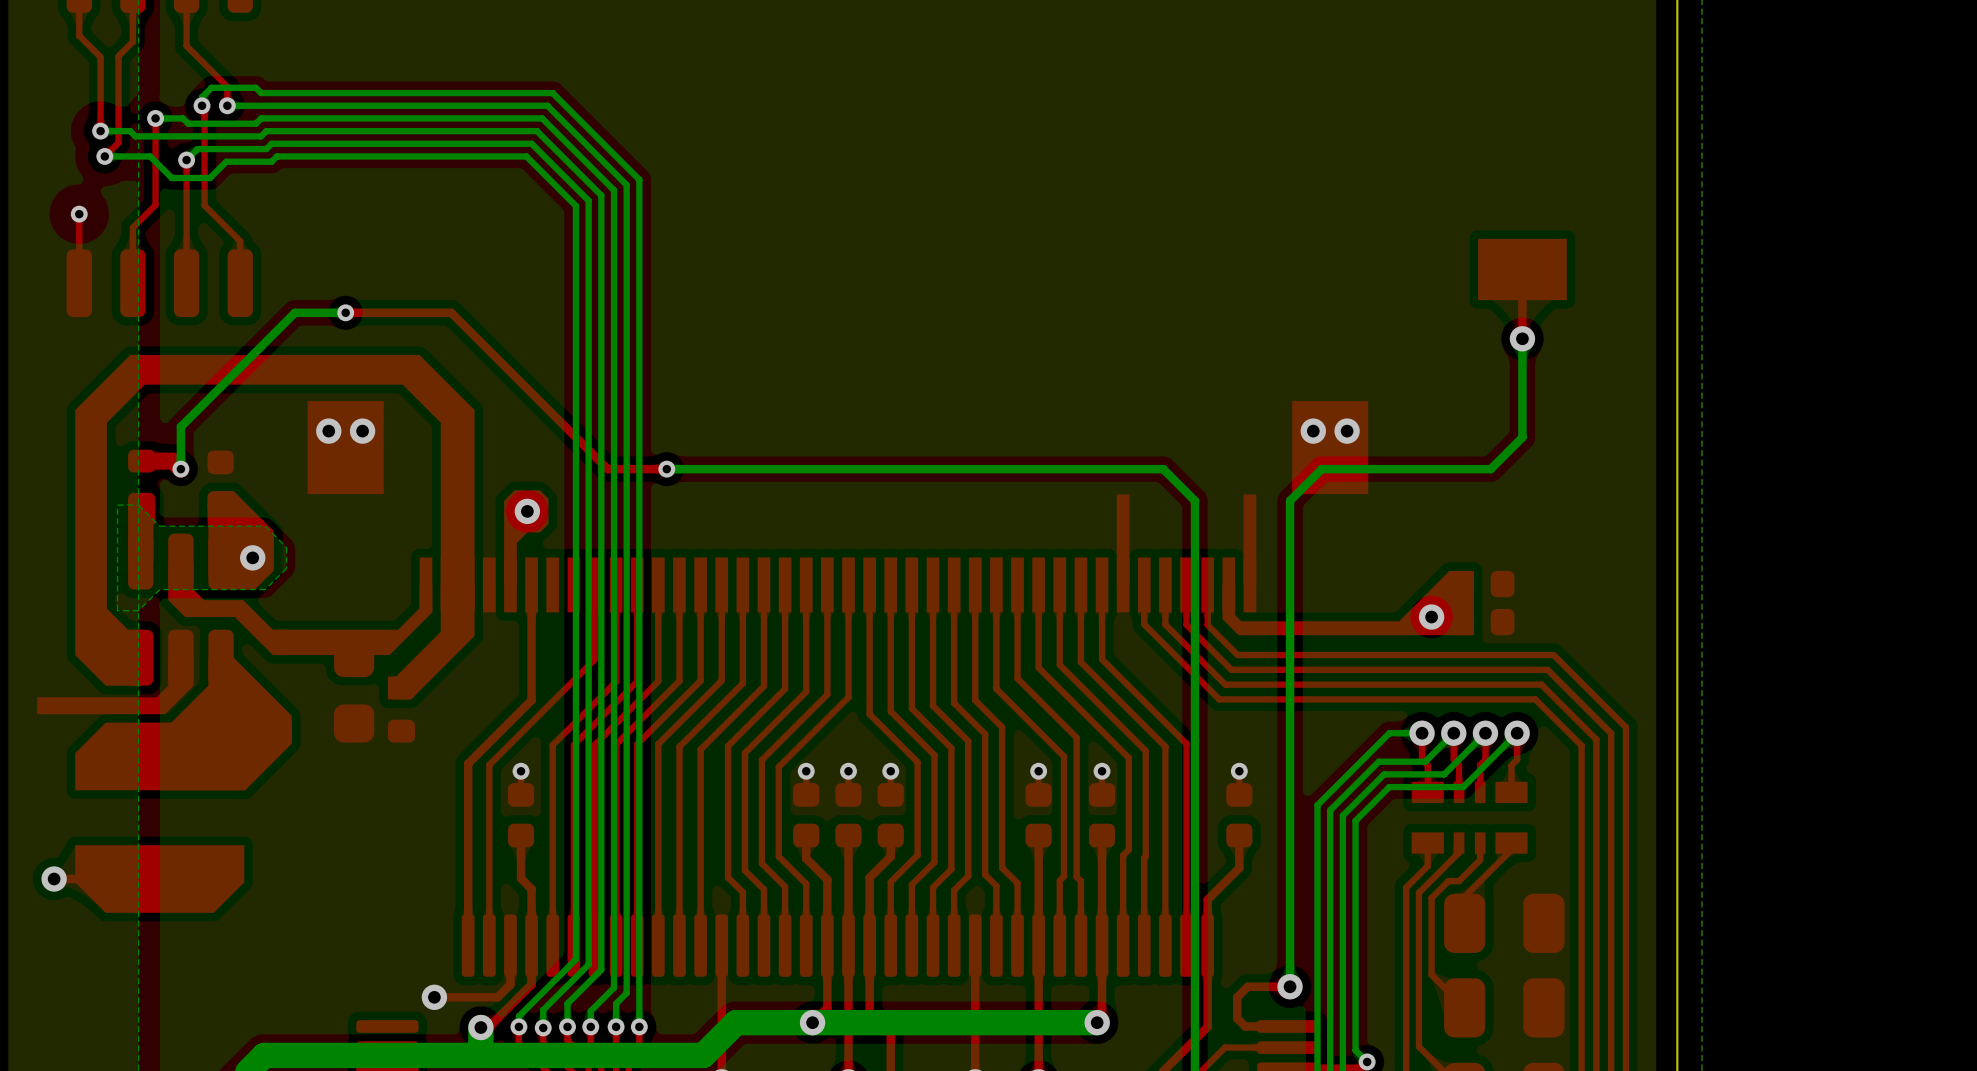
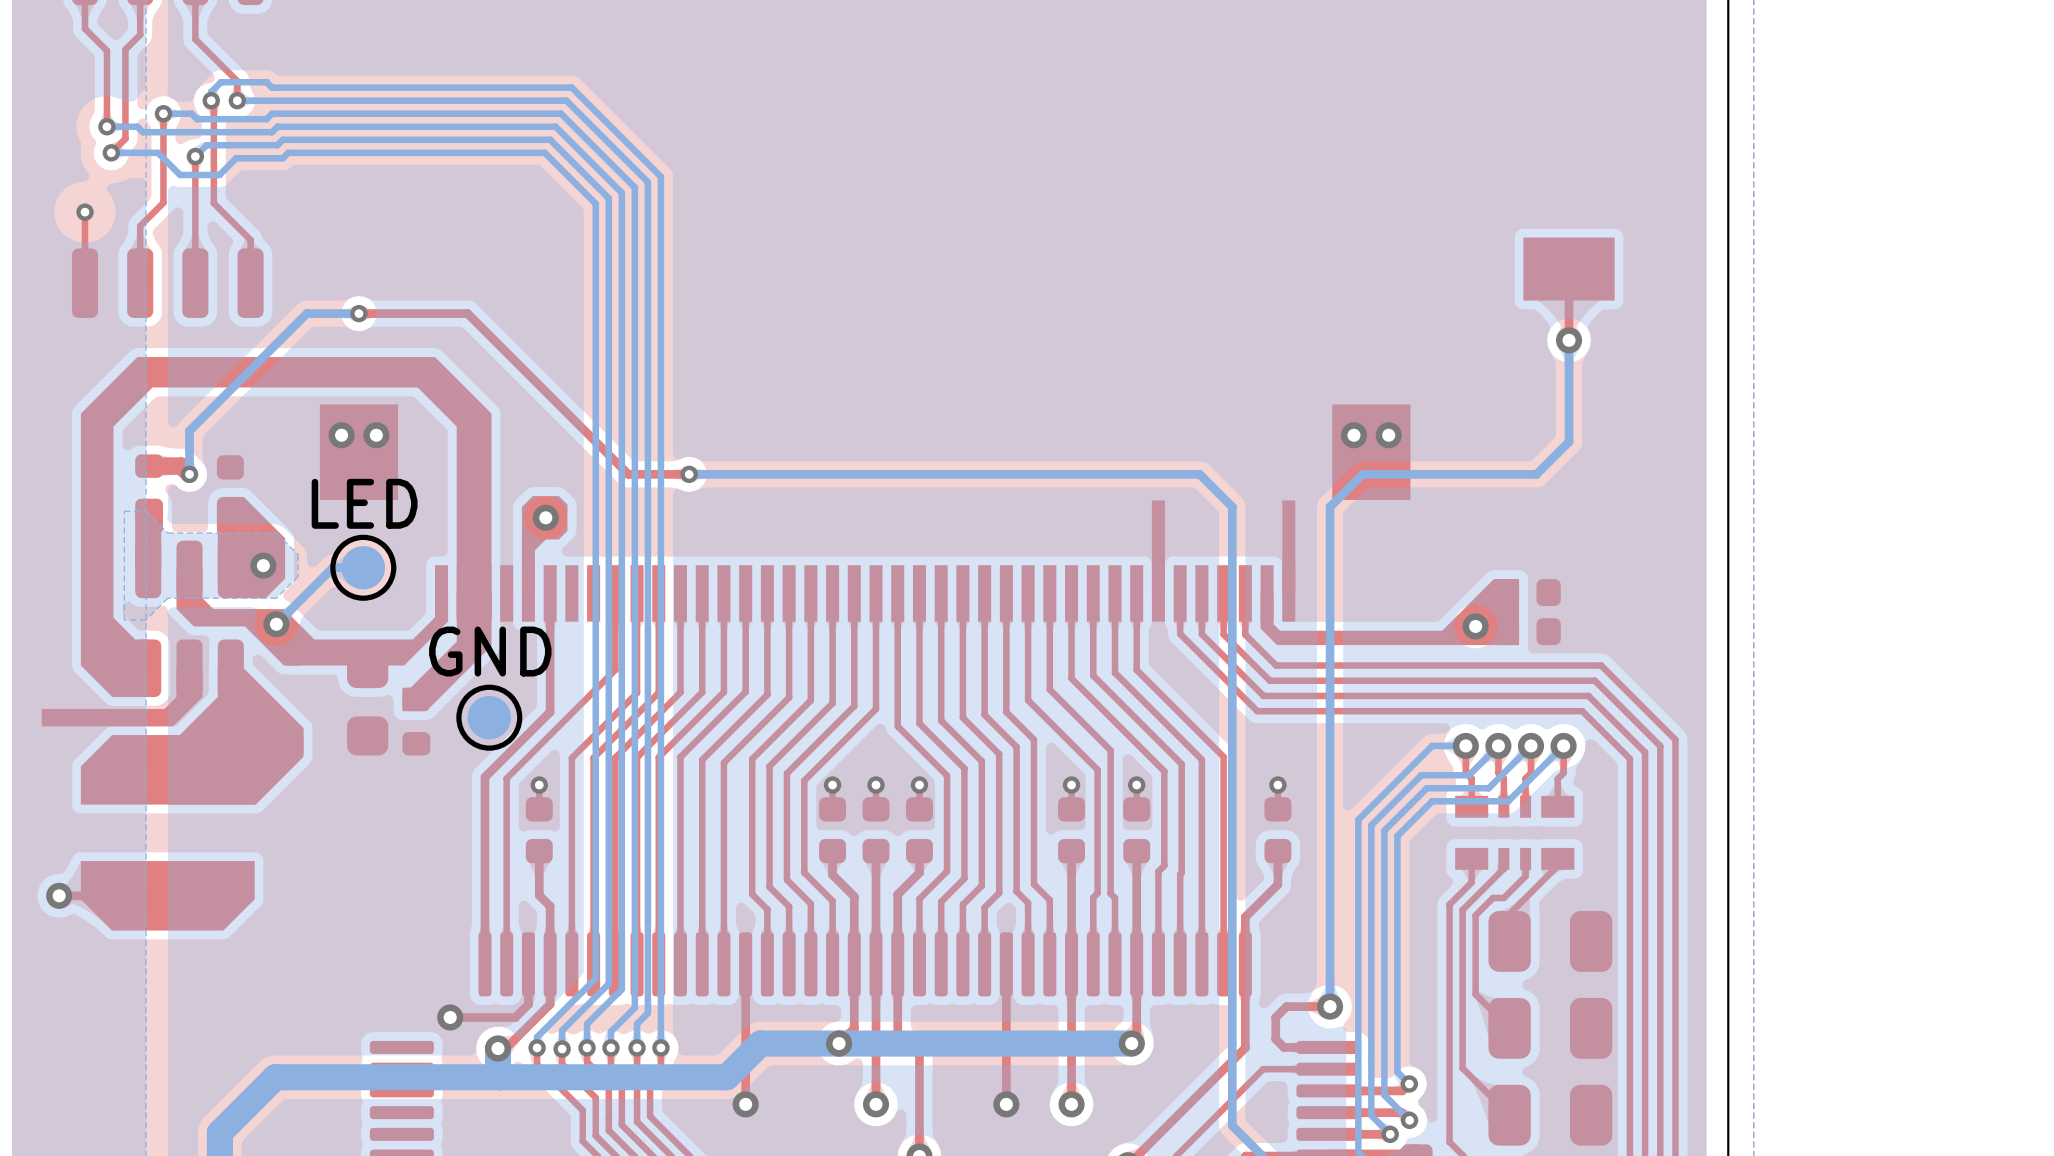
text: none -> LED (364, 503)
bottom track: none -> (363, 567) (332, 567) (276, 624)
part: none -> (363, 567)
drawing shape: [168, 561, 283, 656] -> [176, 569, 315, 666]
via: none -> (276, 624)
text: none -> GND (490, 651)
part: none -> (489, 717)

